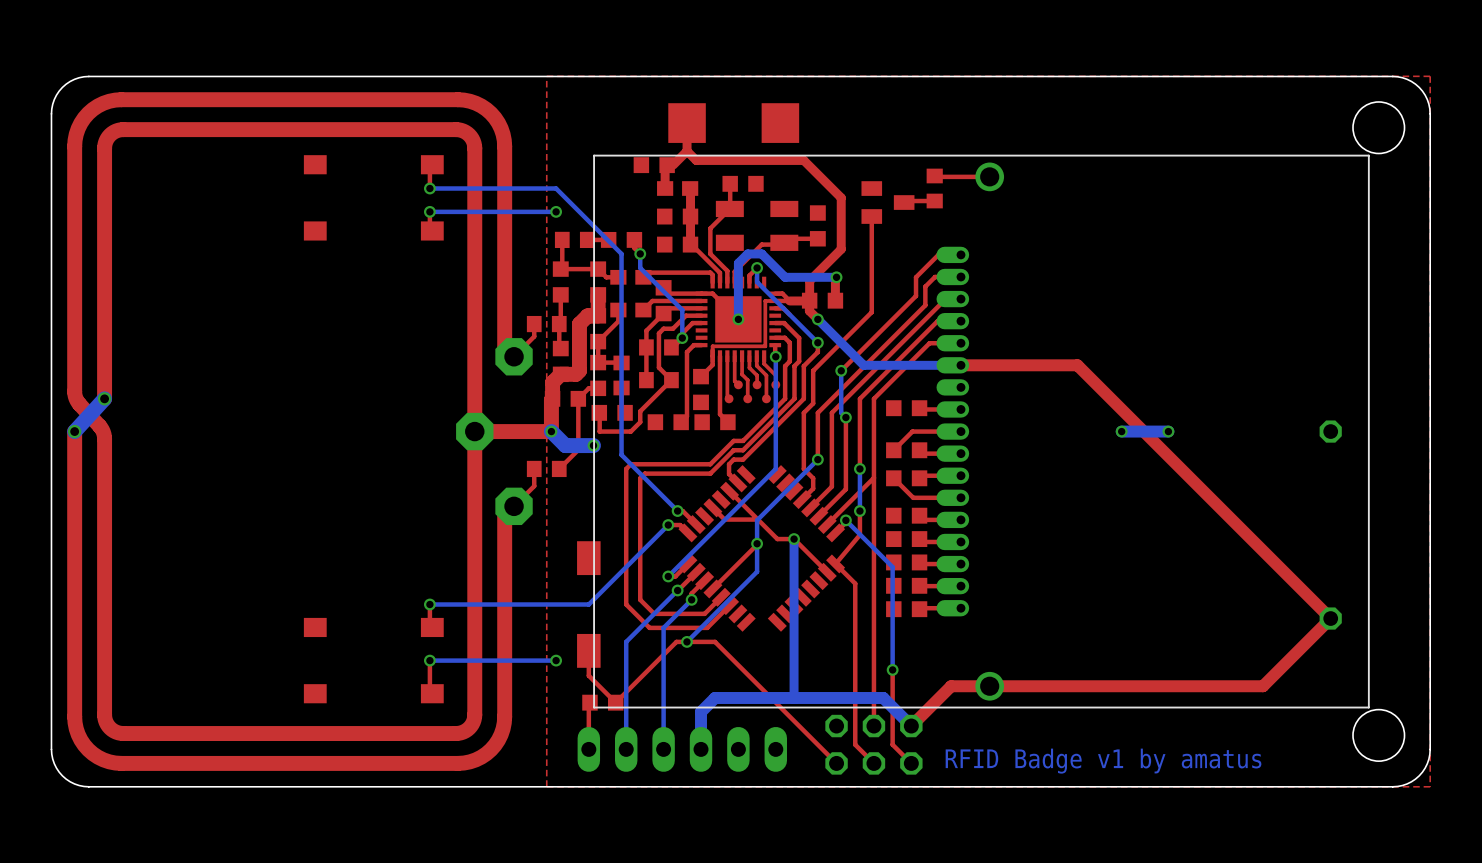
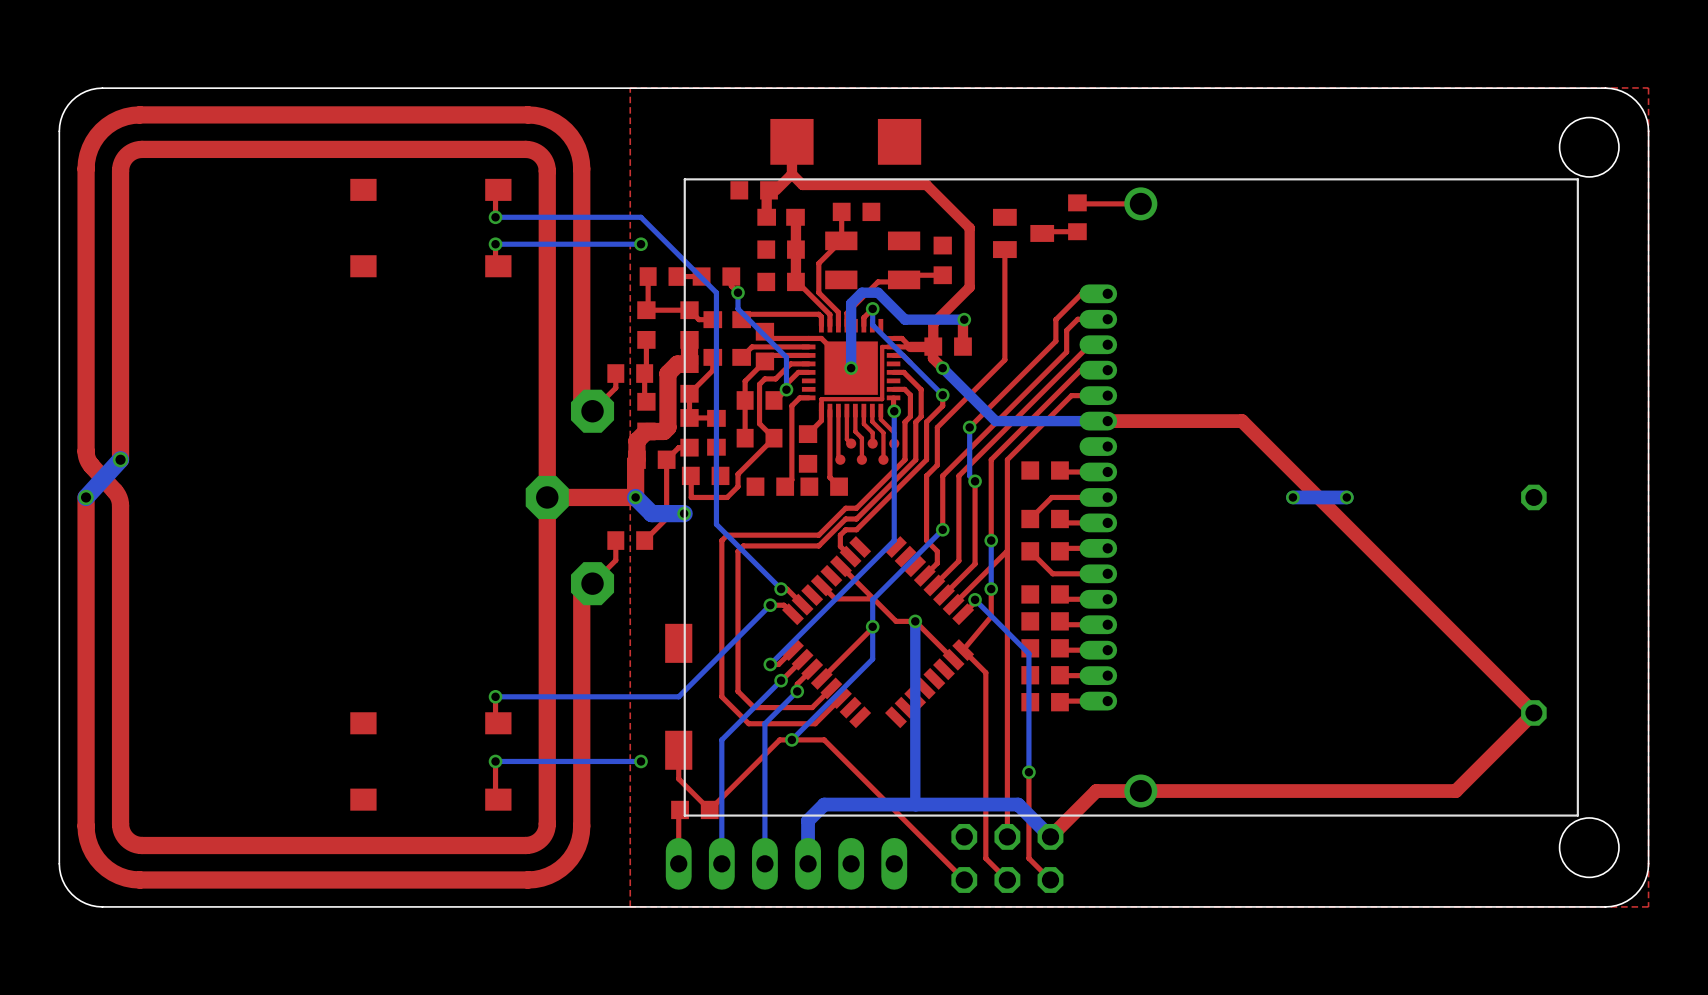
text: RFID Badge v1 by amatus (1103, 761) -> none

